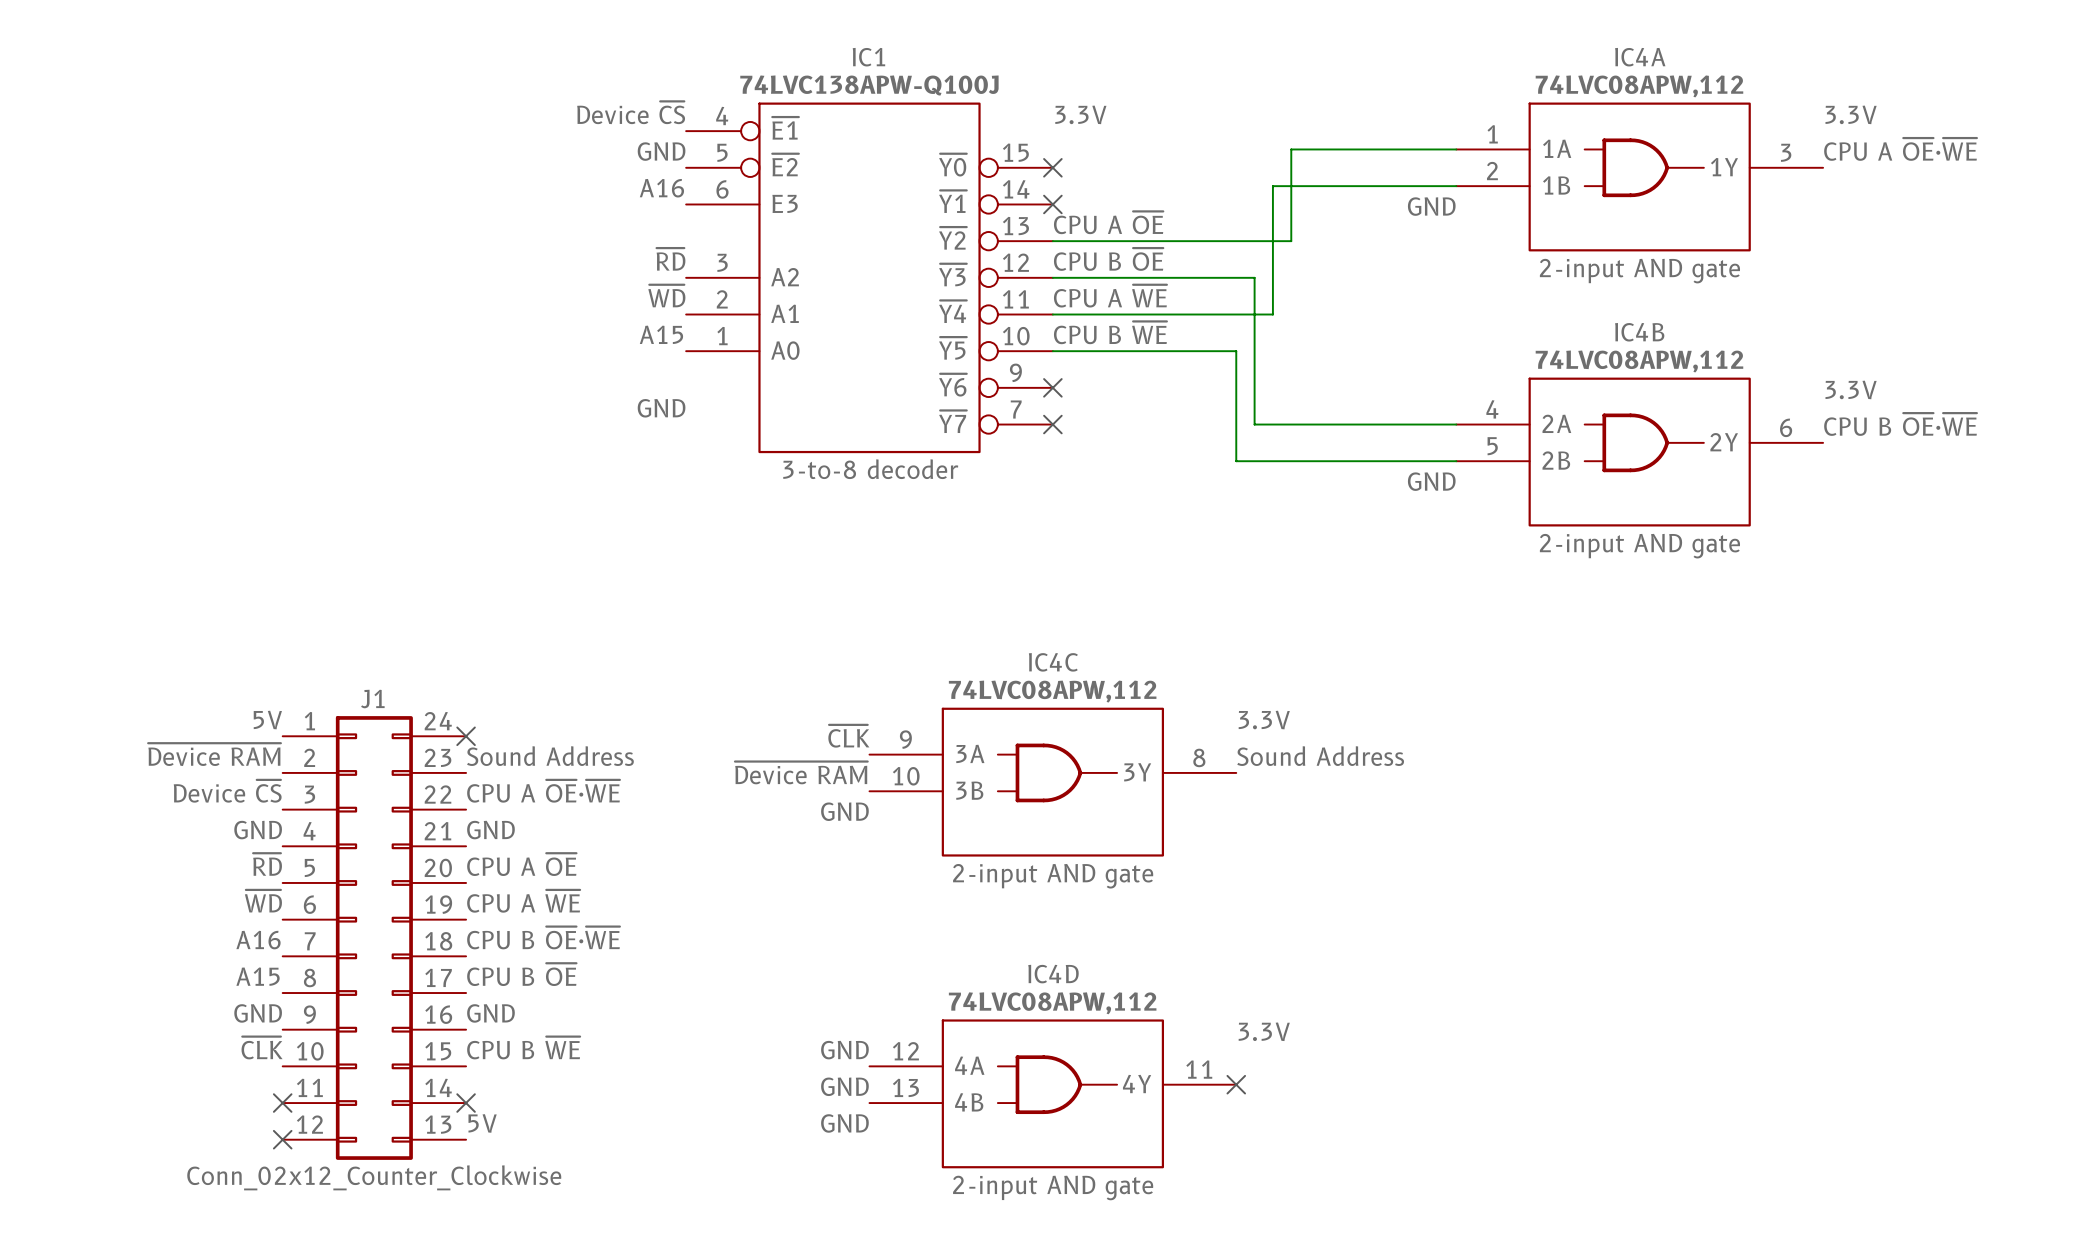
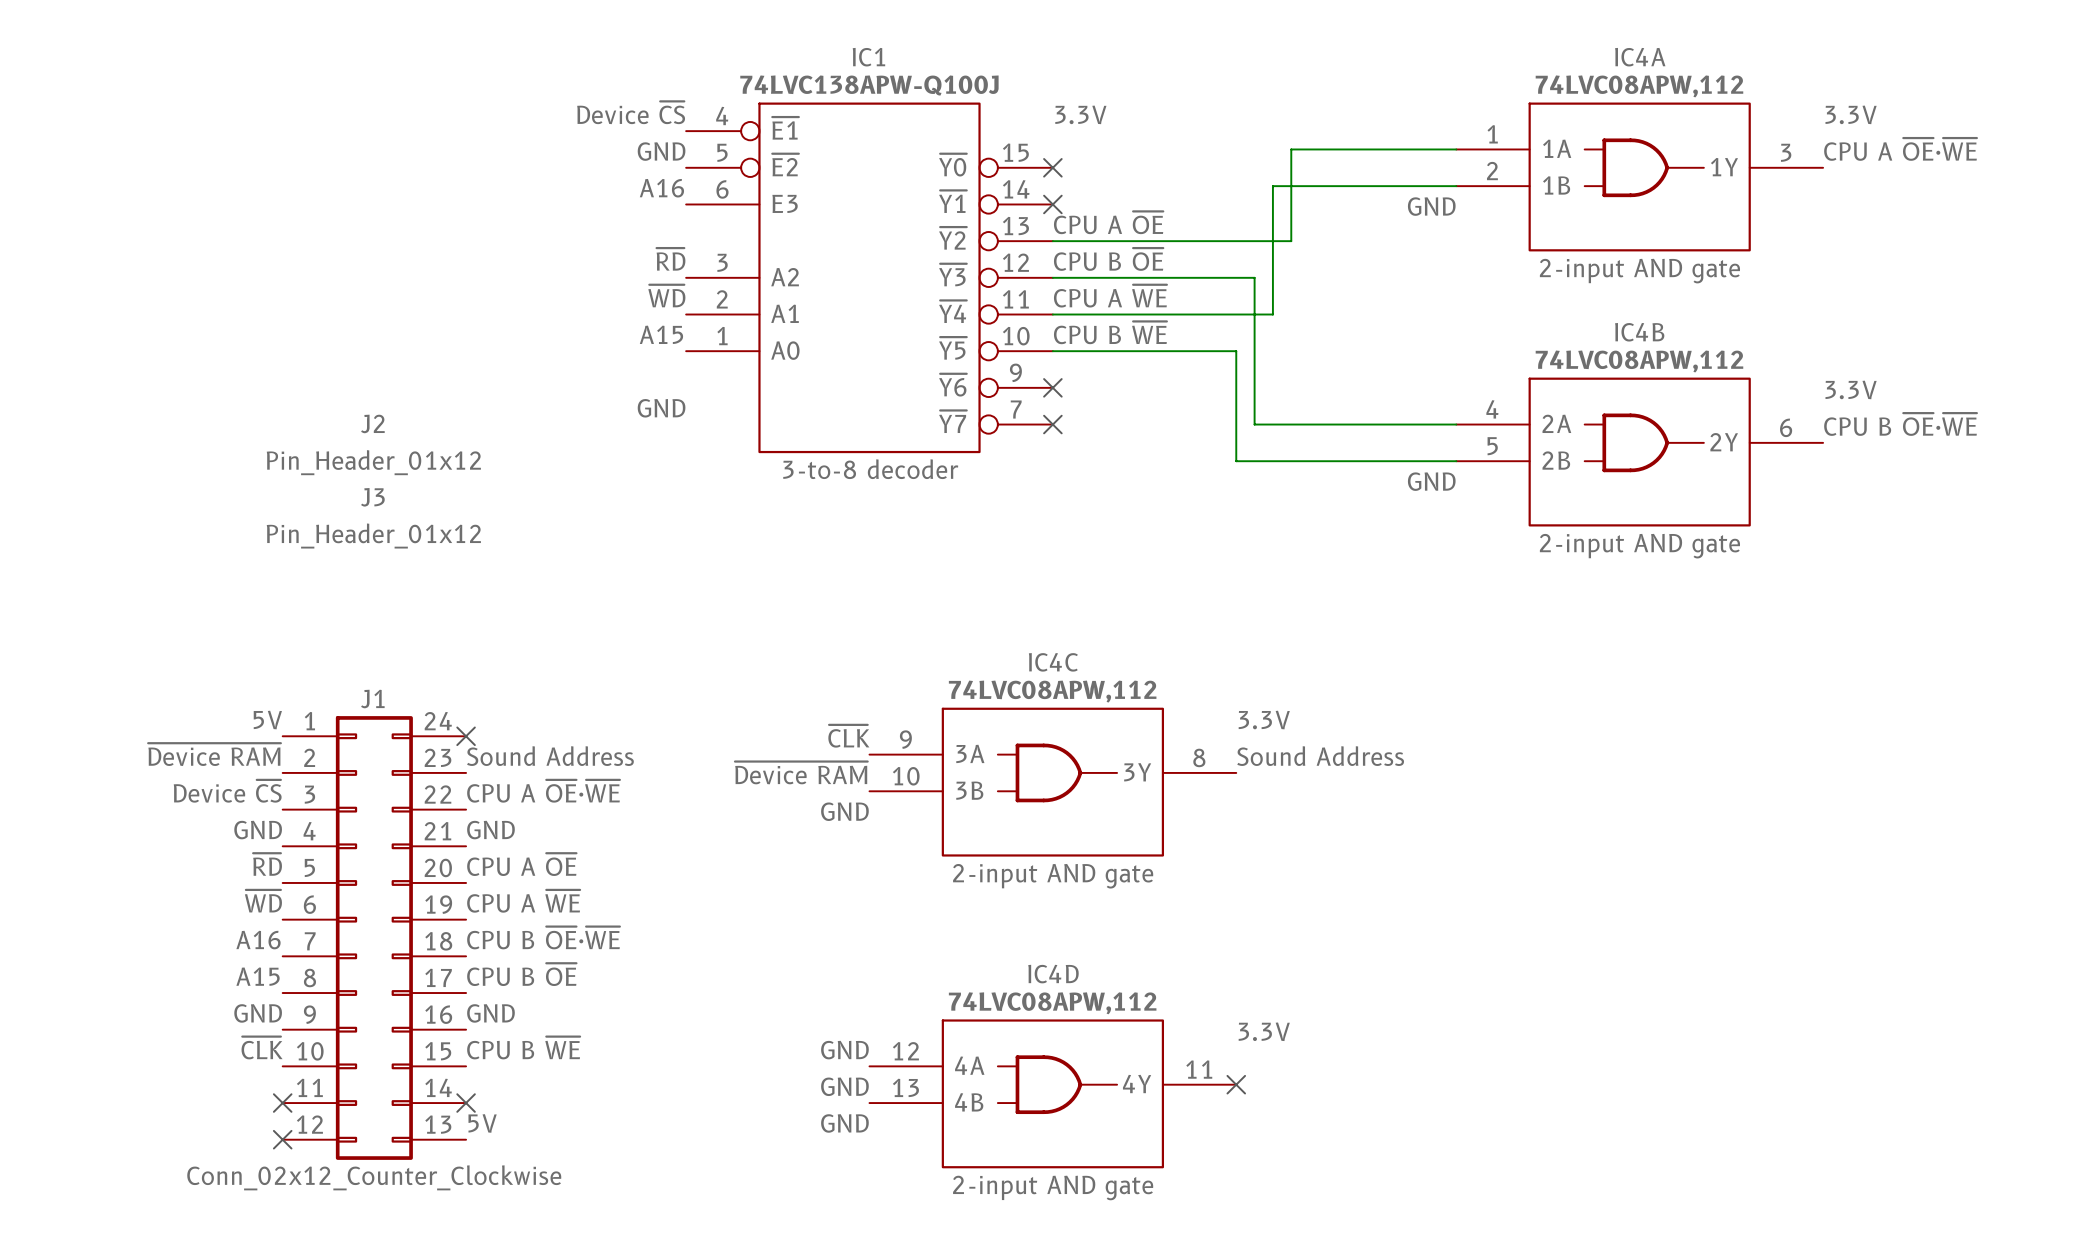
J2: none -> Pin_Header_01x12 (373, 444)
J3: none -> Pin_Header_01x12 (373, 518)

